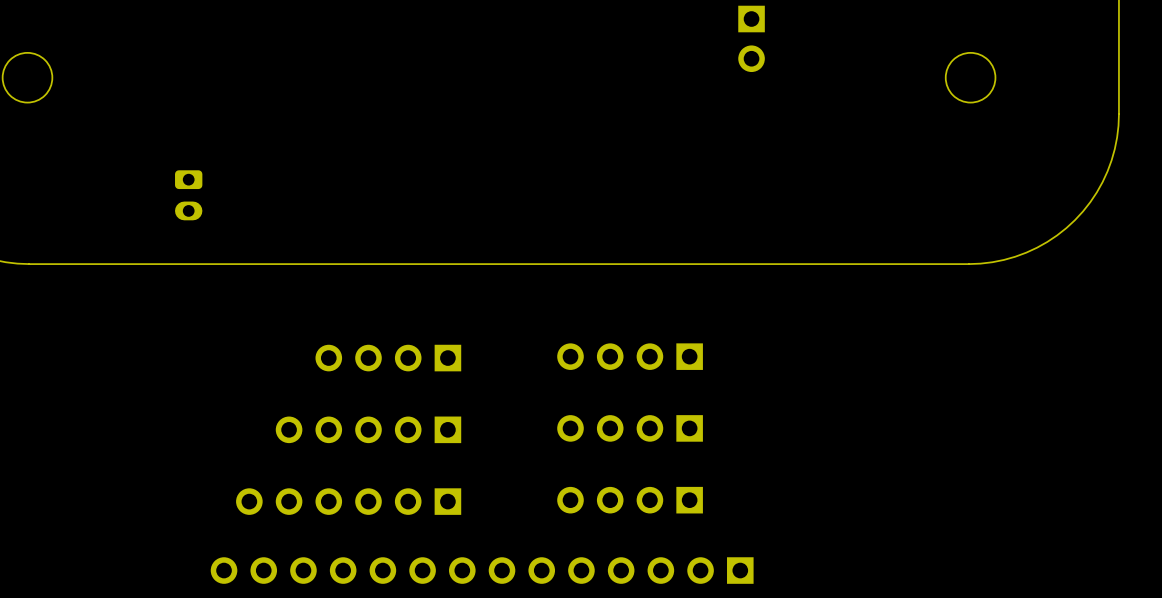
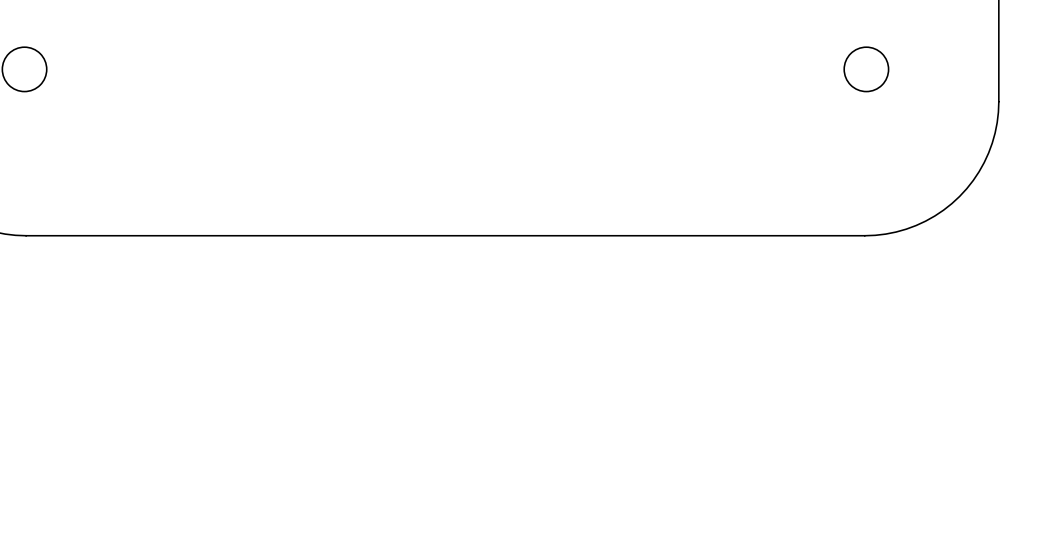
part: (751, 38) -> none
part: (188, 195) -> none
part: (630, 356) -> none
part: (388, 358) -> none
part: (630, 428) -> none
part: (368, 429) -> none
part: (630, 500) -> none
part: (348, 501) -> none
part: (482, 570) -> none

